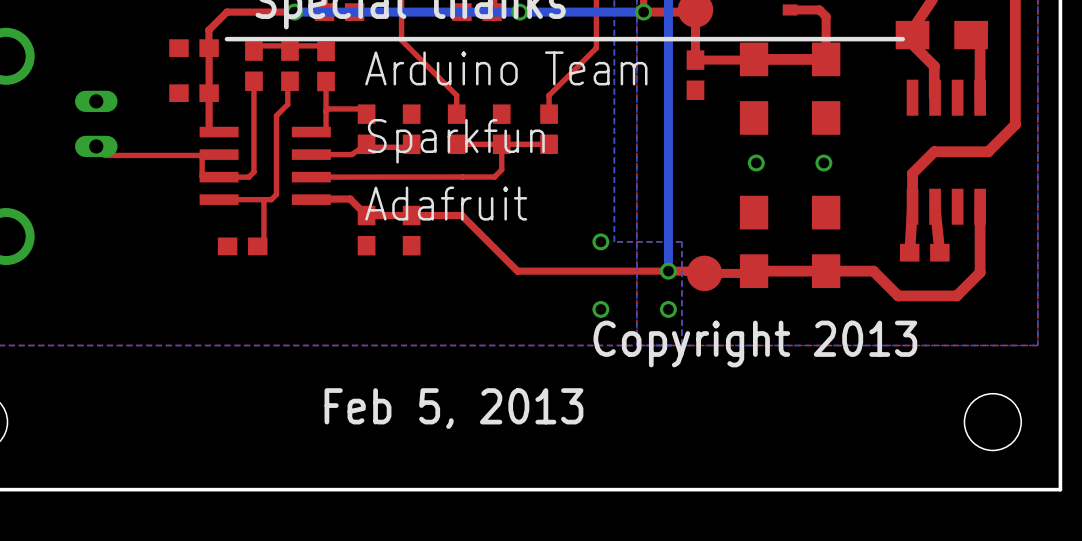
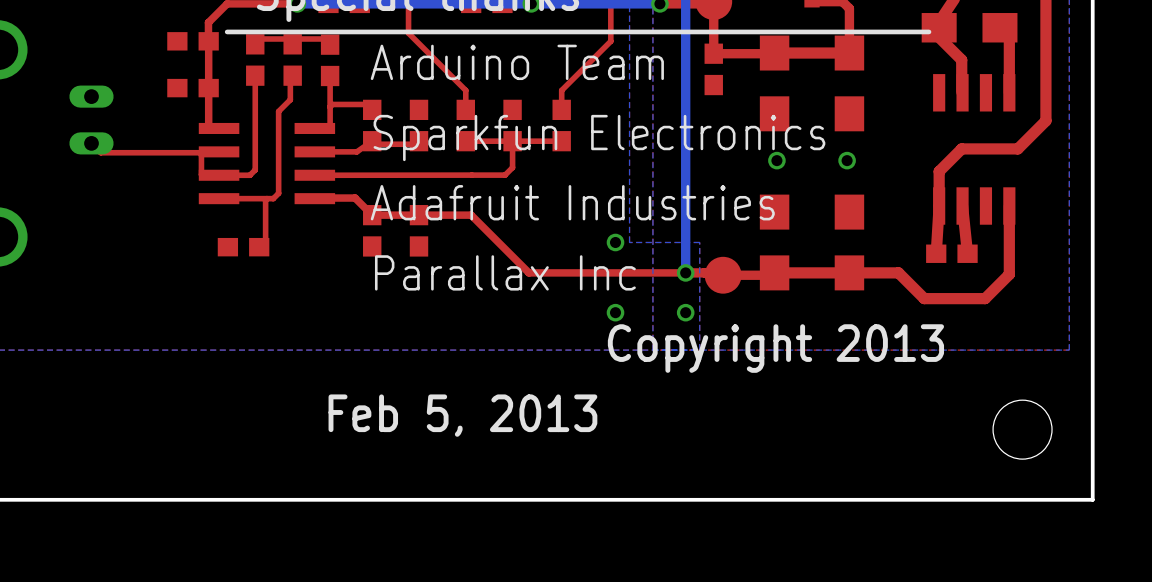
text: Sparkfun (456, 141) -> Sparkfun Electronics (599, 138)
text: Adafruit (446, 203) -> Adafruit Industries (572, 202)
text: none -> Parallax Inc (505, 272)

